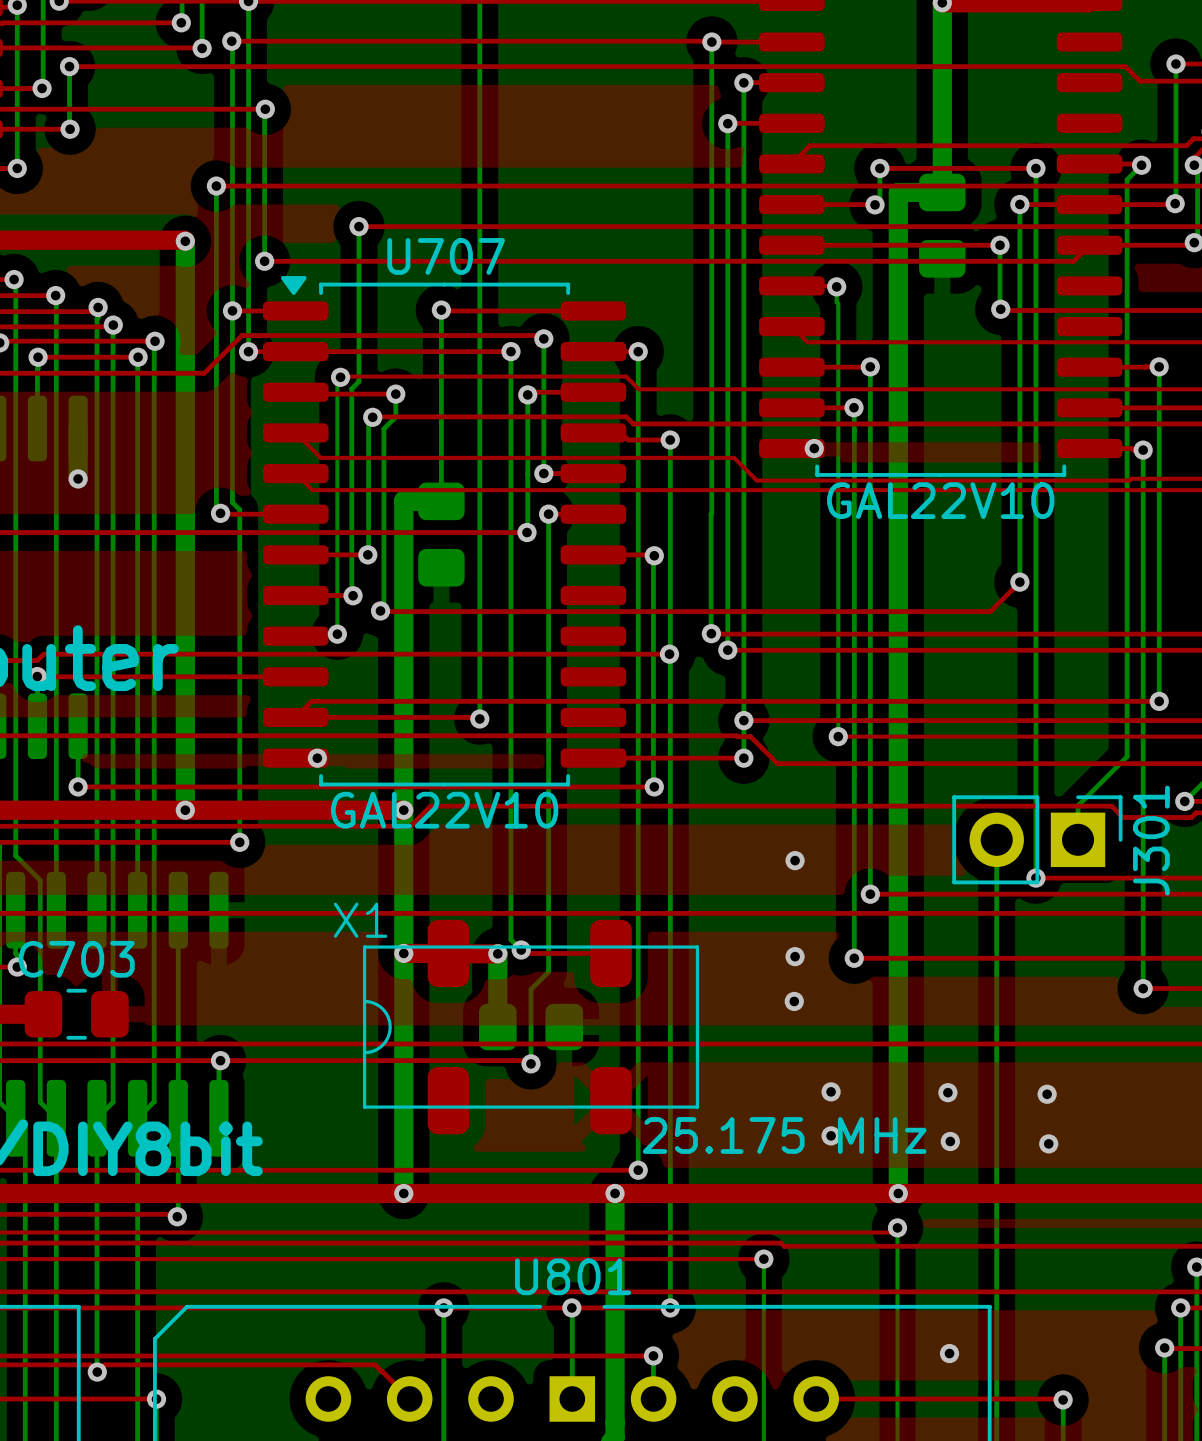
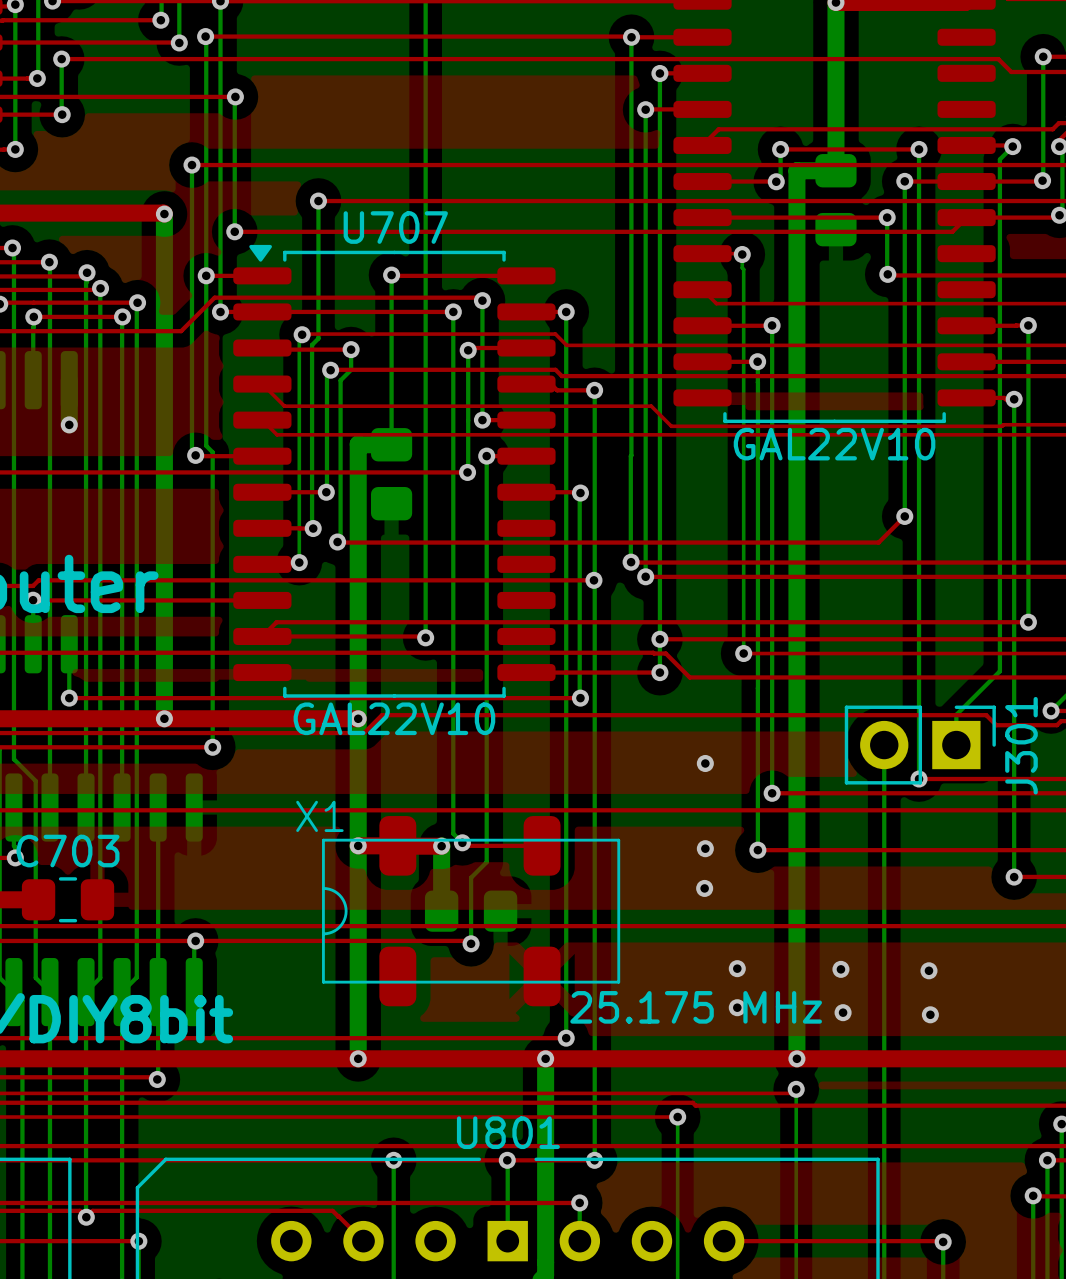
via: (814, 448) -> none
via: (317, 758) -> none
via: (949, 1353) -> none

